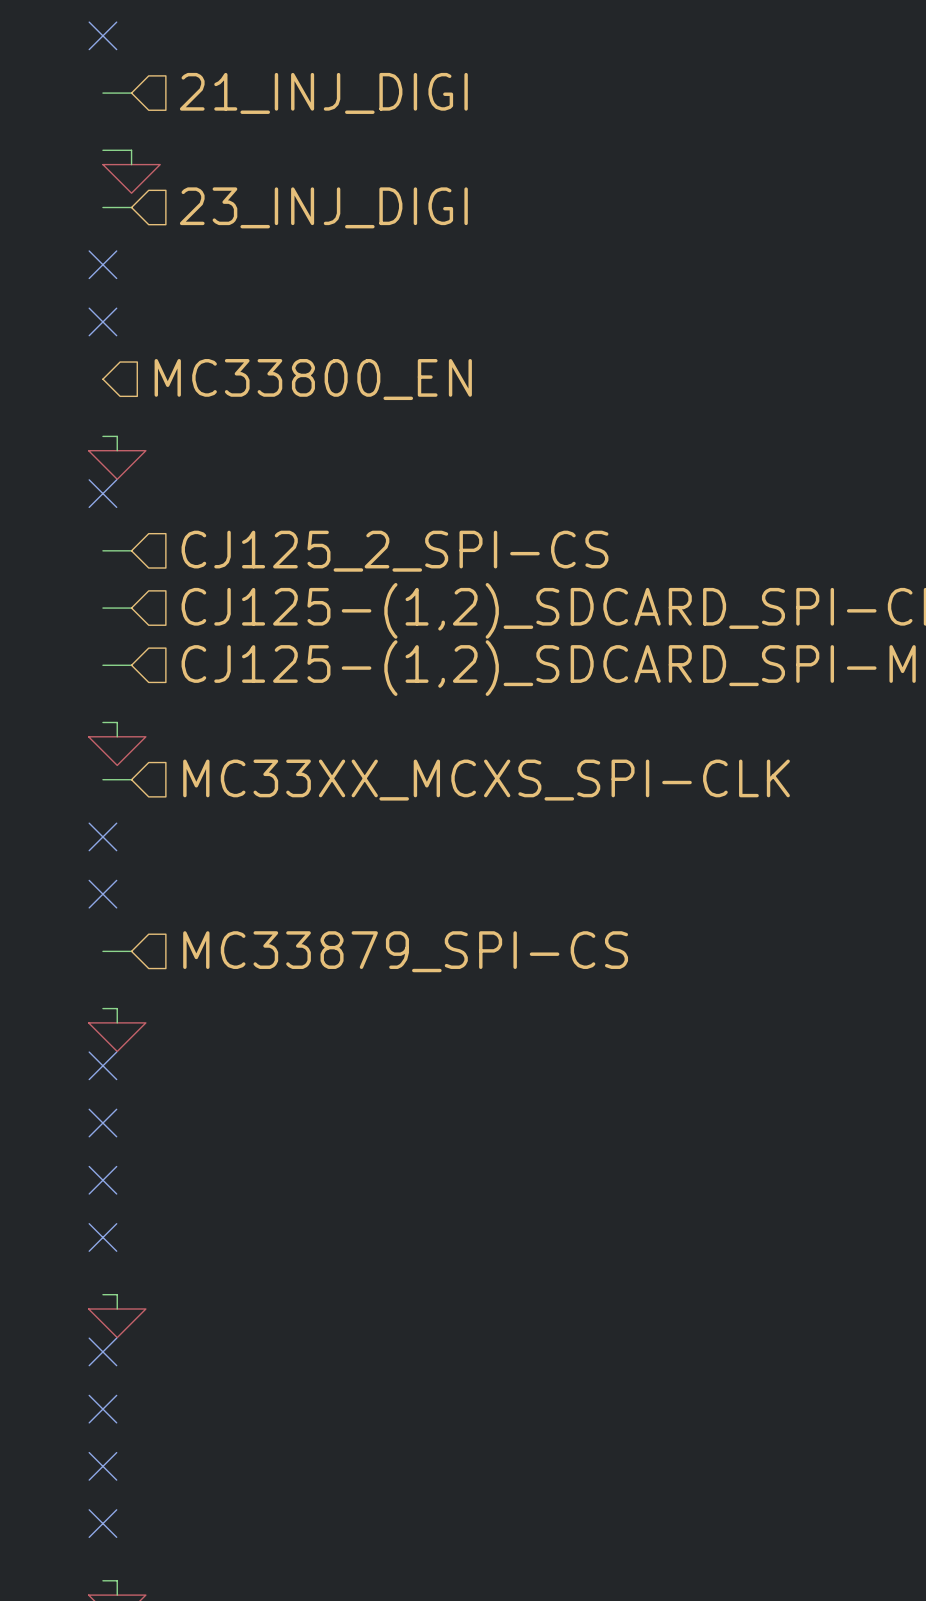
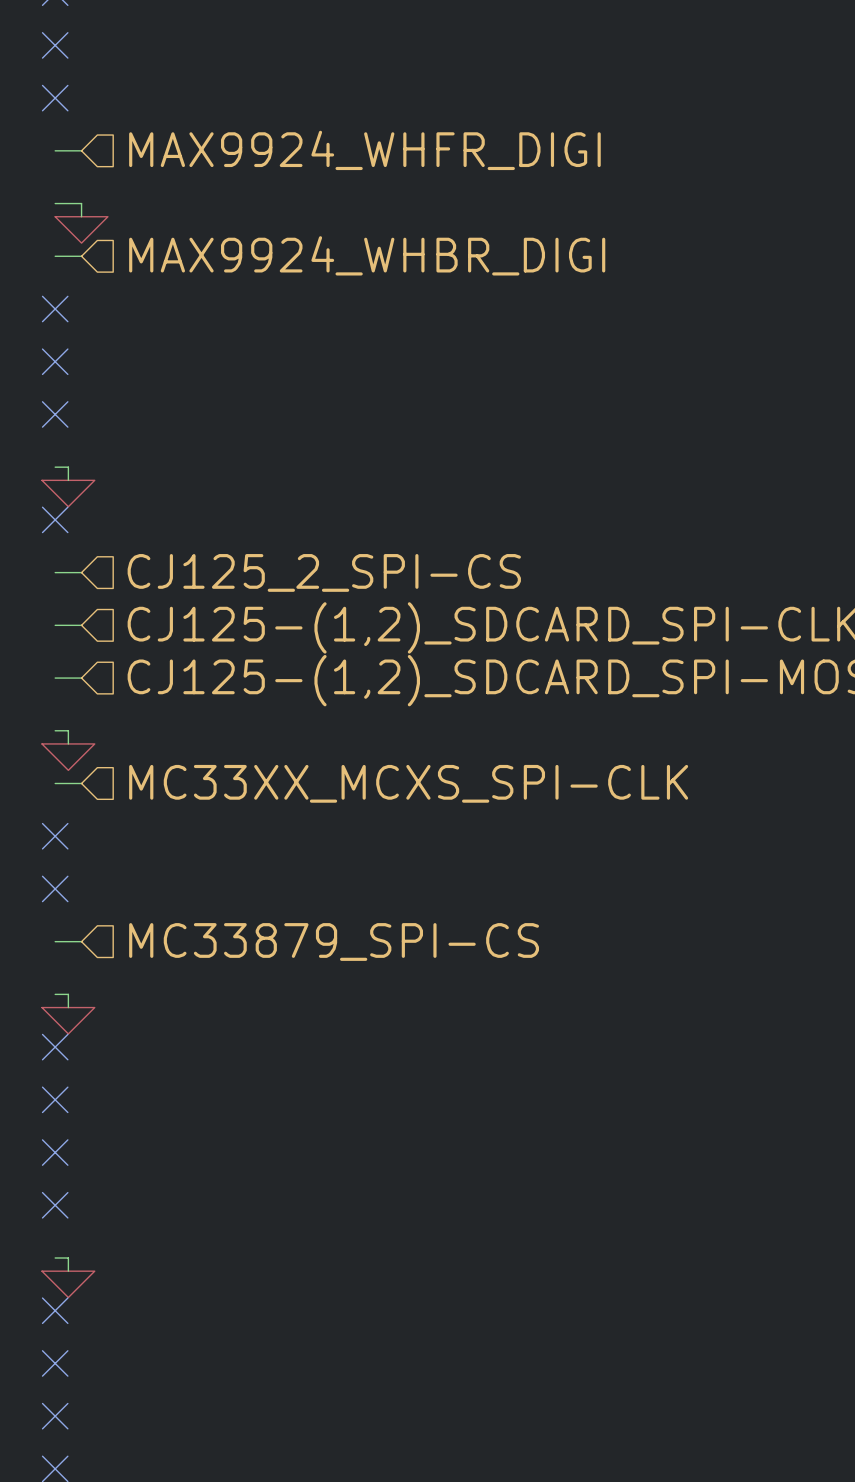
hierarchical label: 21_INJ_DIGI (323, 93) -> MAX9924_WHFR_DIGI (364, 150)
hierarchical label: 23_INJ_DIGI (323, 207) -> MAX9924_WHBR_DIGI (367, 255)
no-connect mark: none -> (55, 414)
hierarchical label: MC33800_EN (313, 379) -> none

